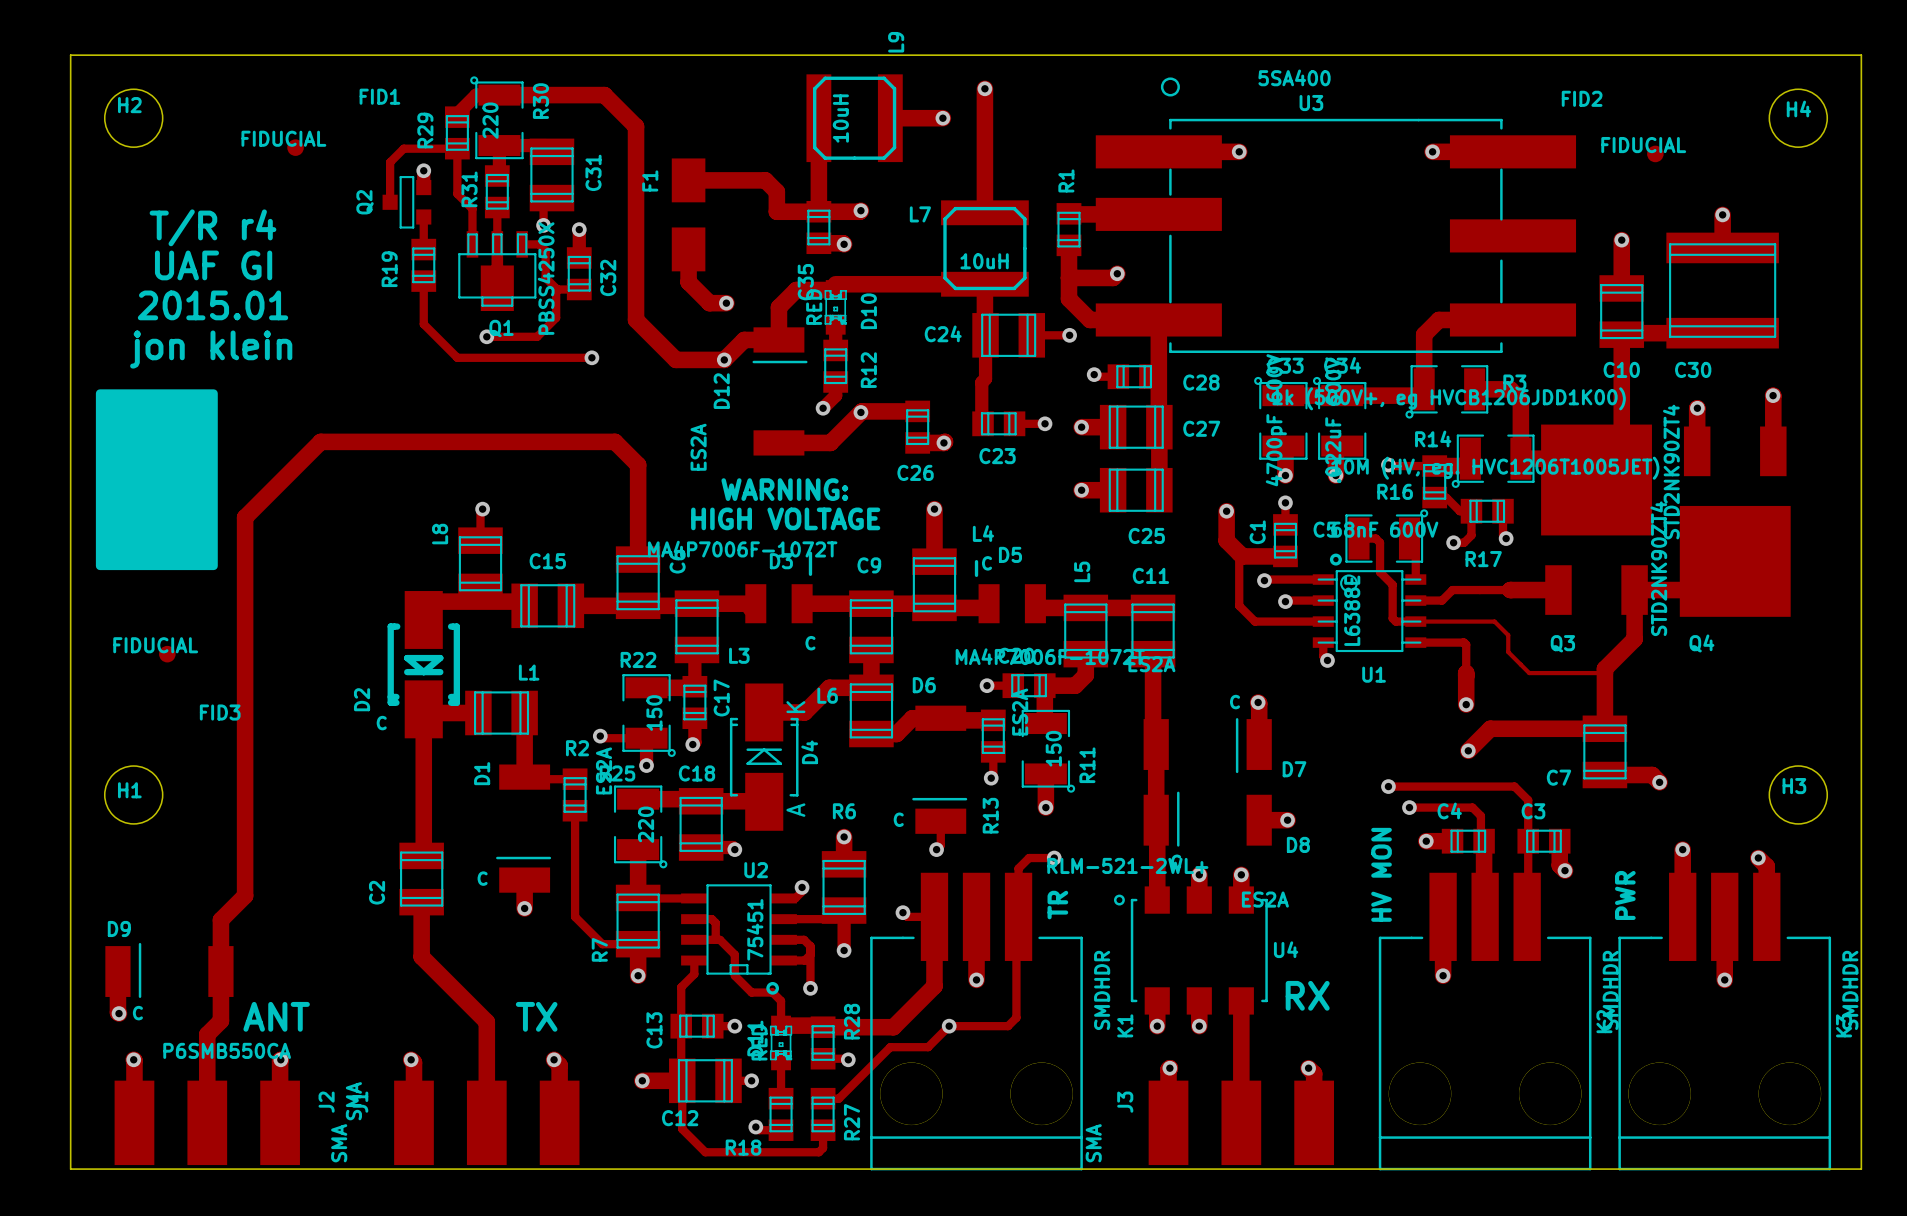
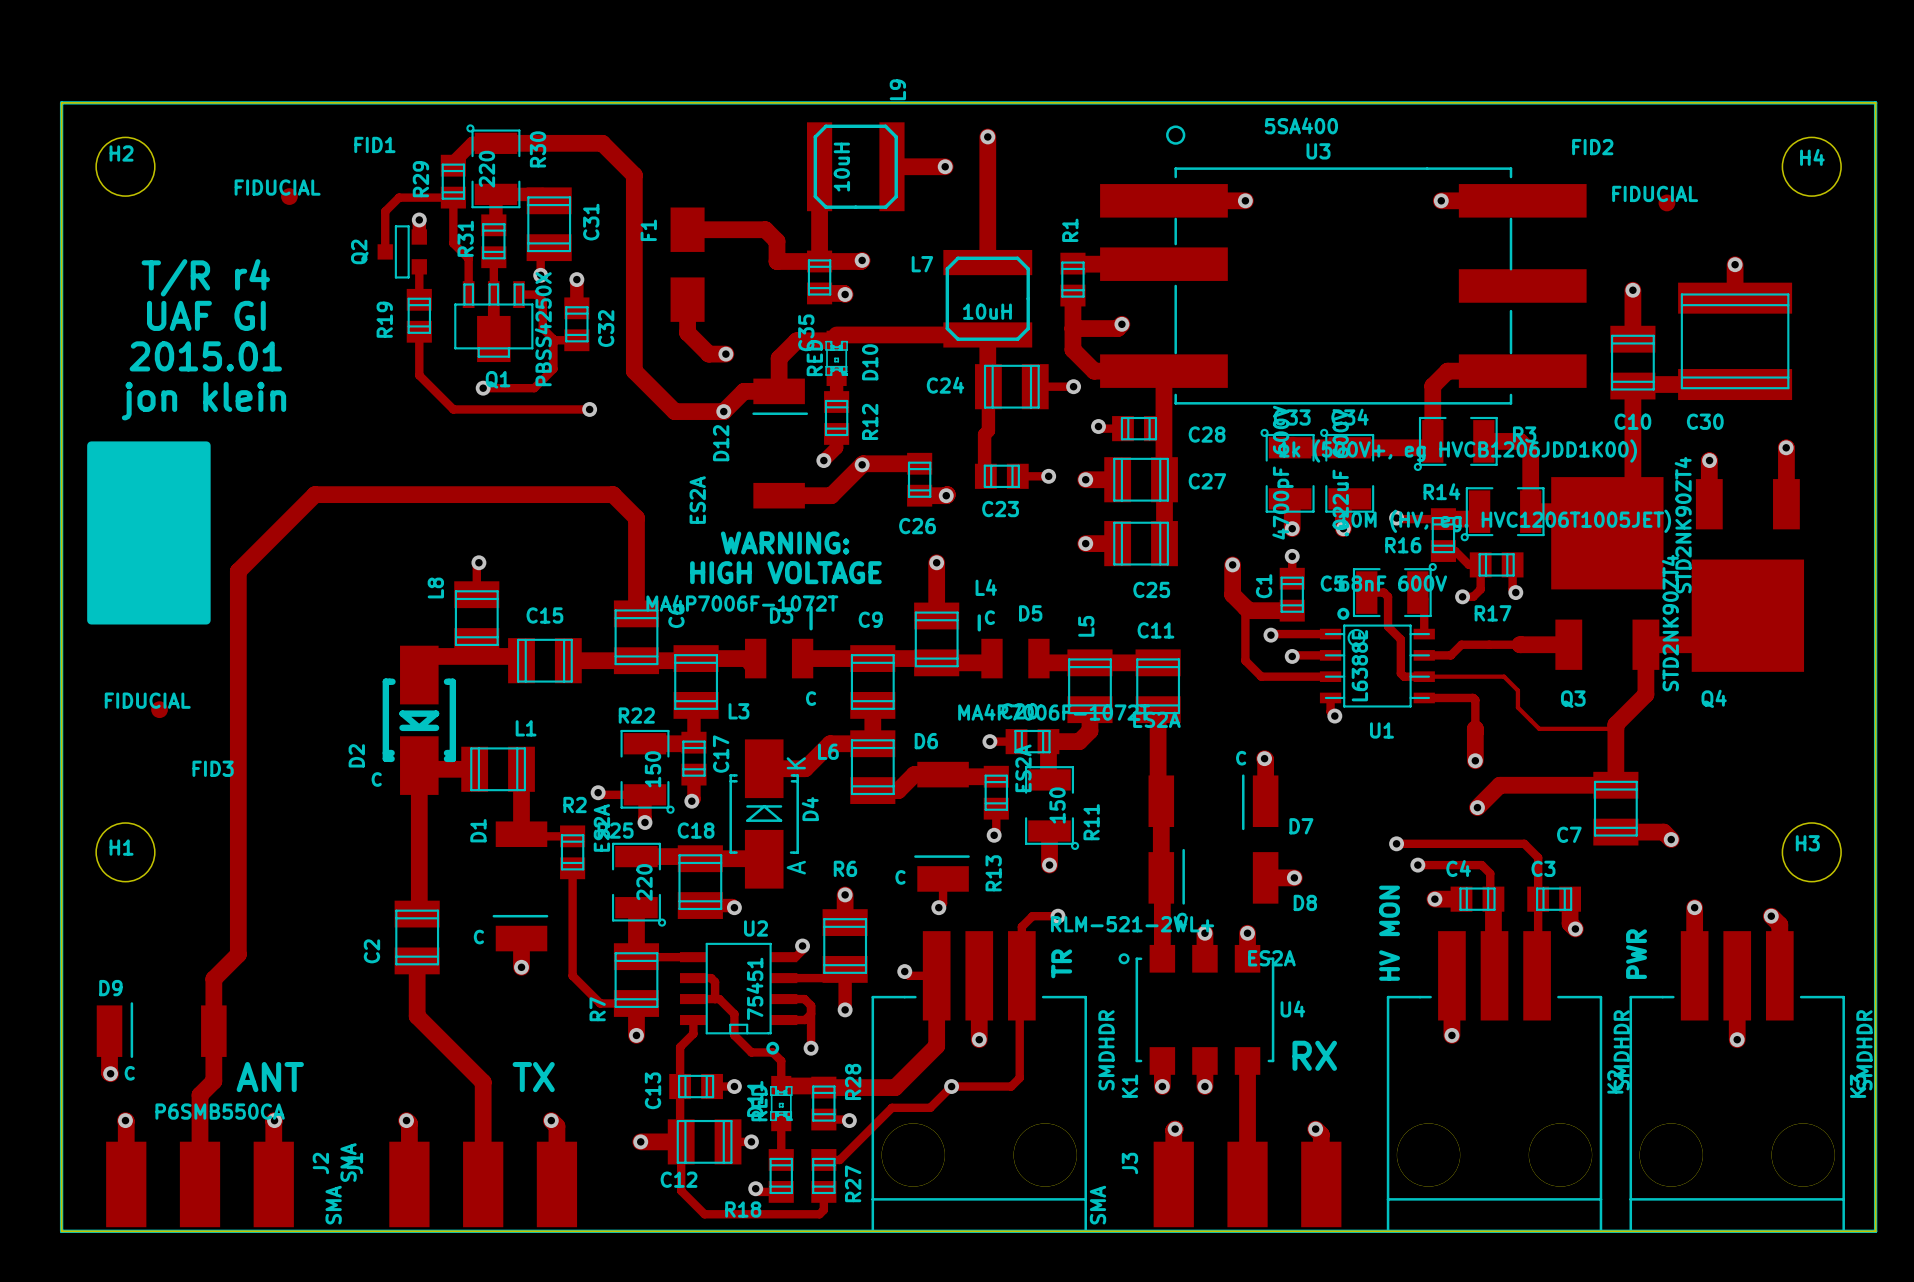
line: none -> (61, 102) (61, 1231) (1875, 1231) (1875, 102) (61, 102)
D5 name position: D5 (1010, 554) -> D5 (1030, 613)

